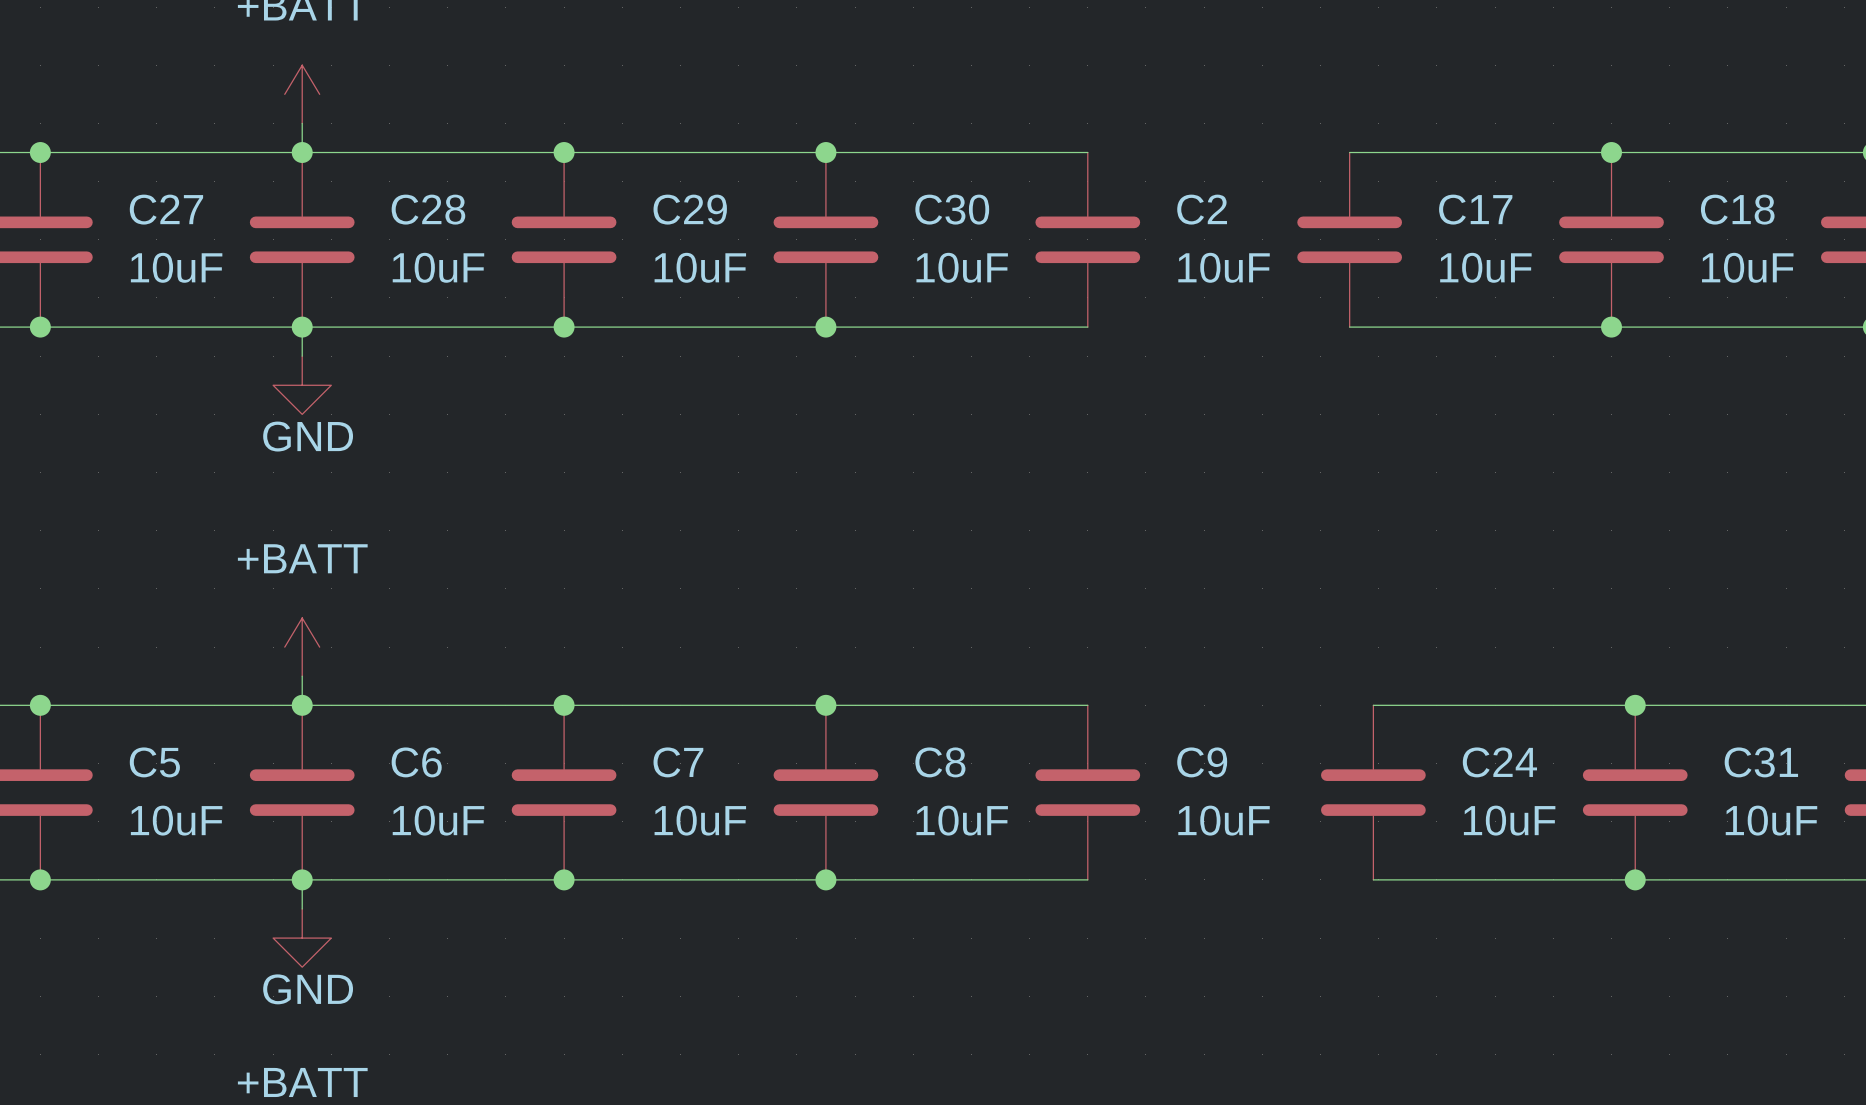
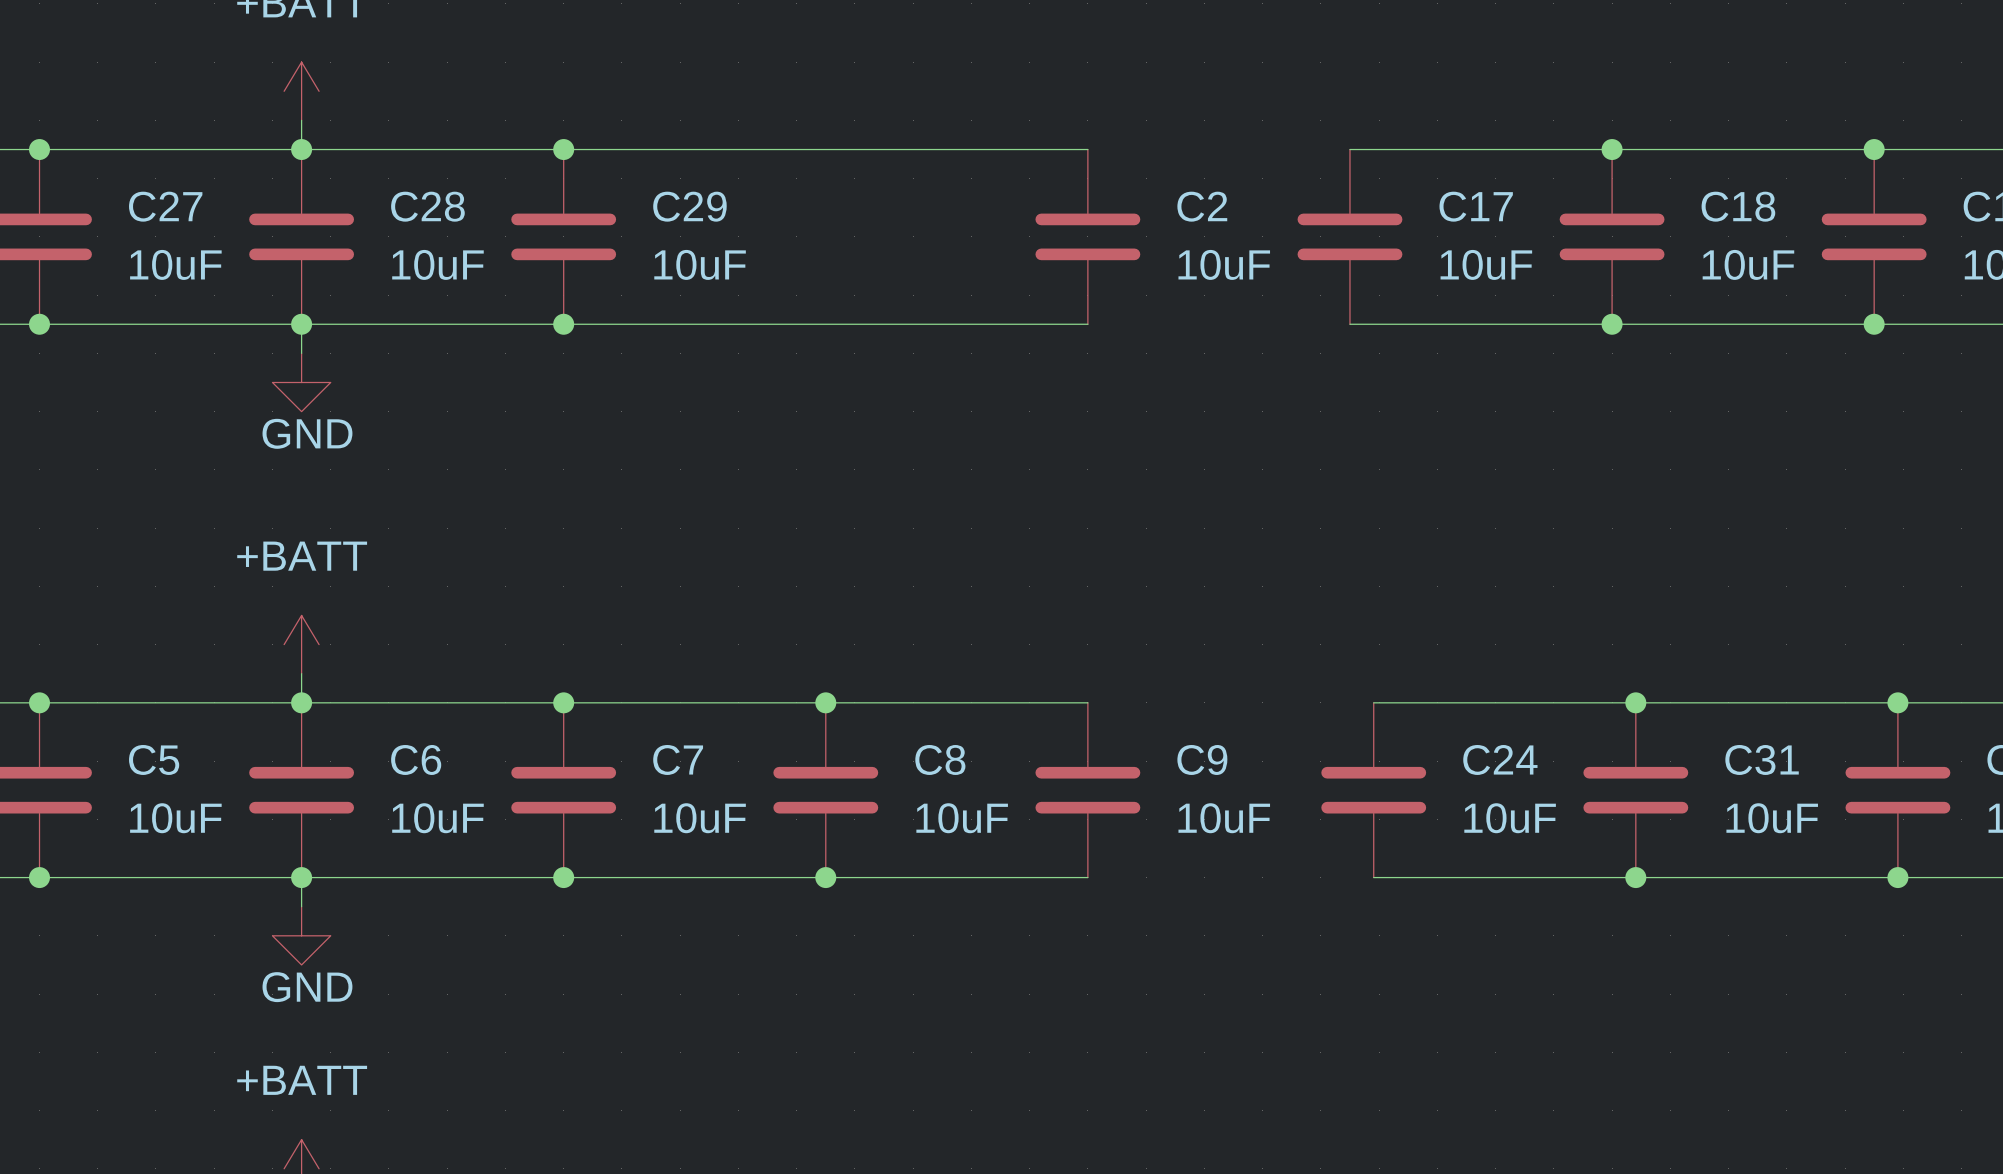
junction: (825, 152) -> none
C30: 10uF (825, 239) -> none
junction: (825, 327) -> none

